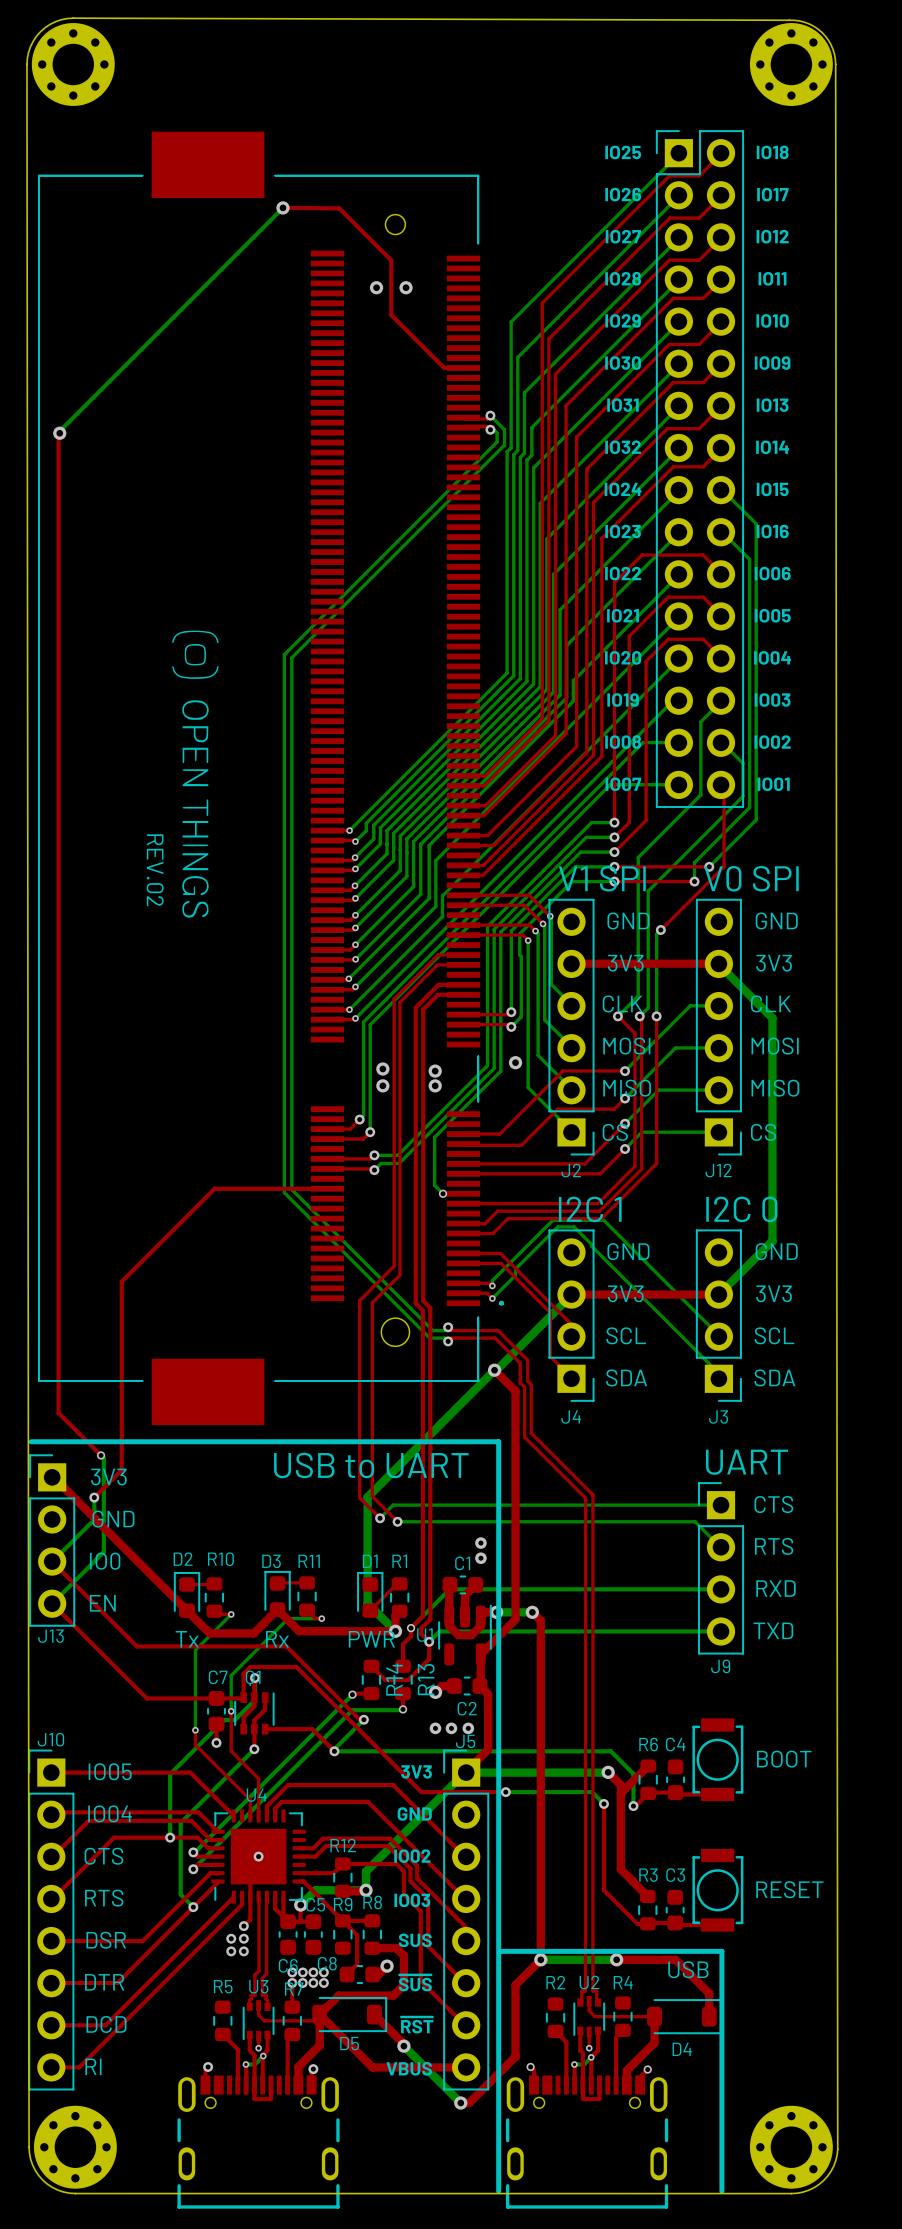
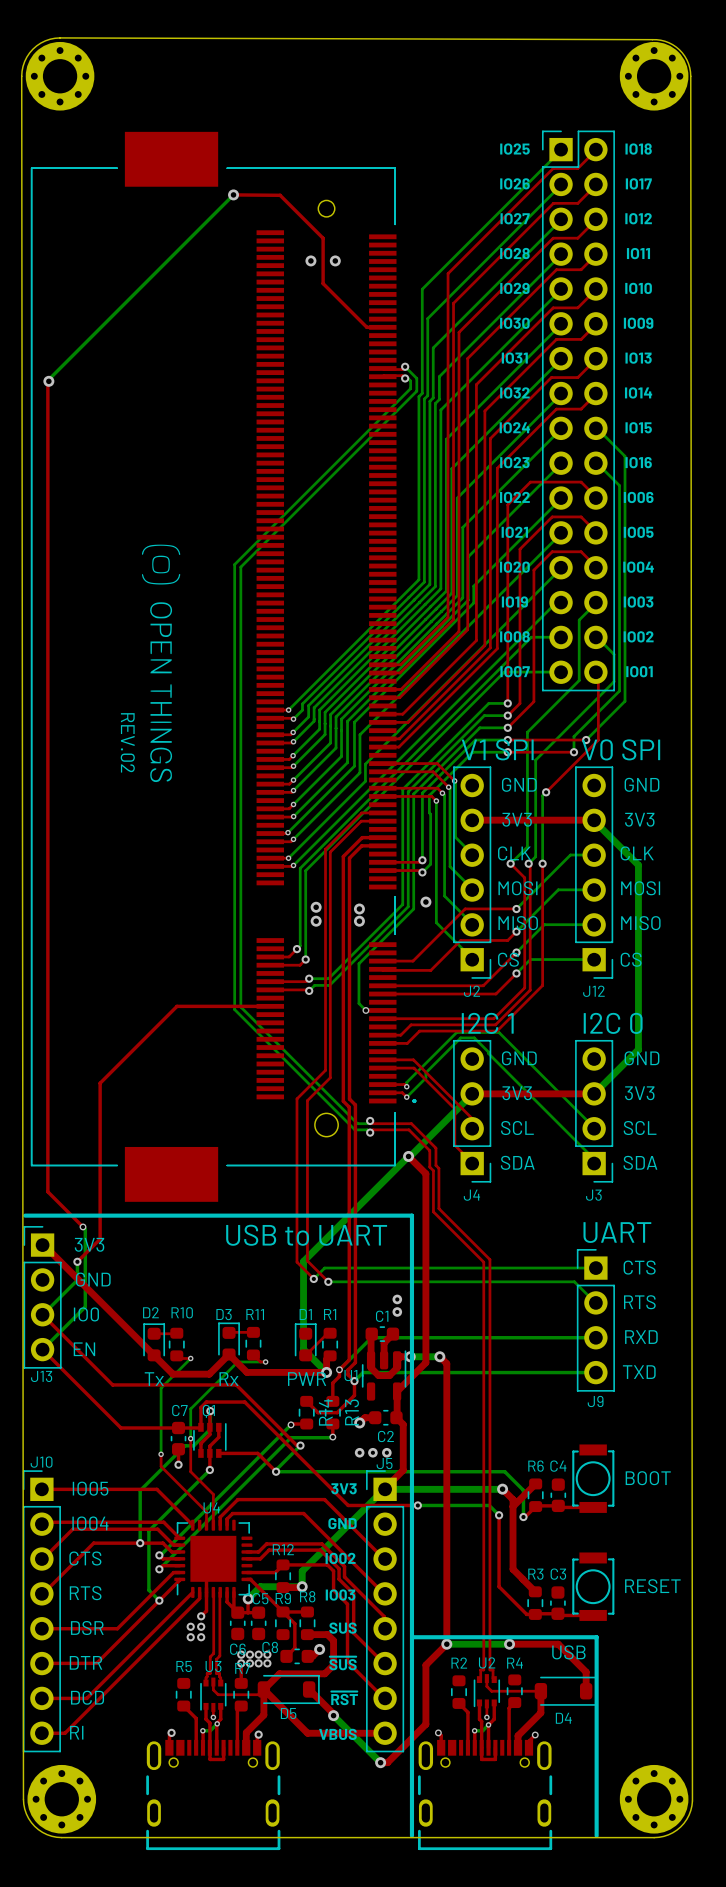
via: (258, 1856) -> none

